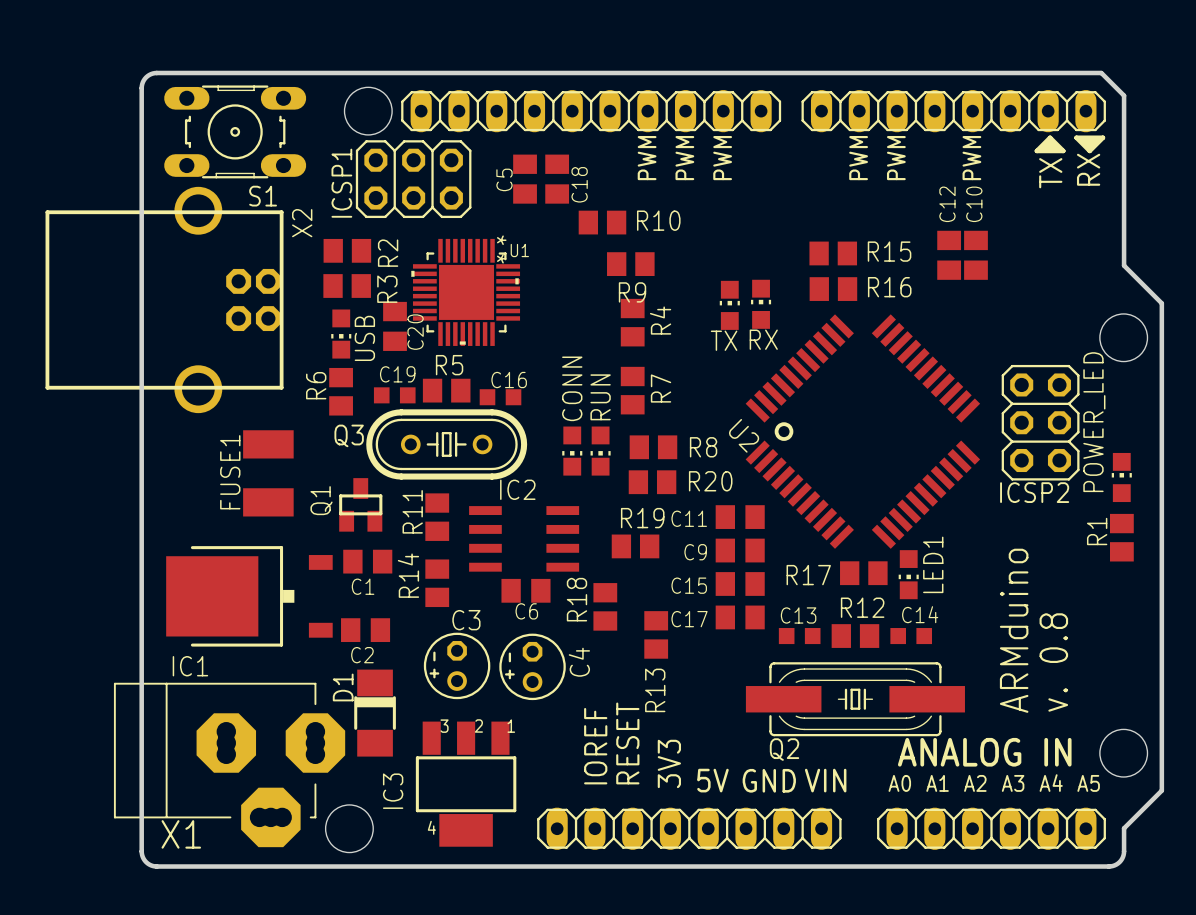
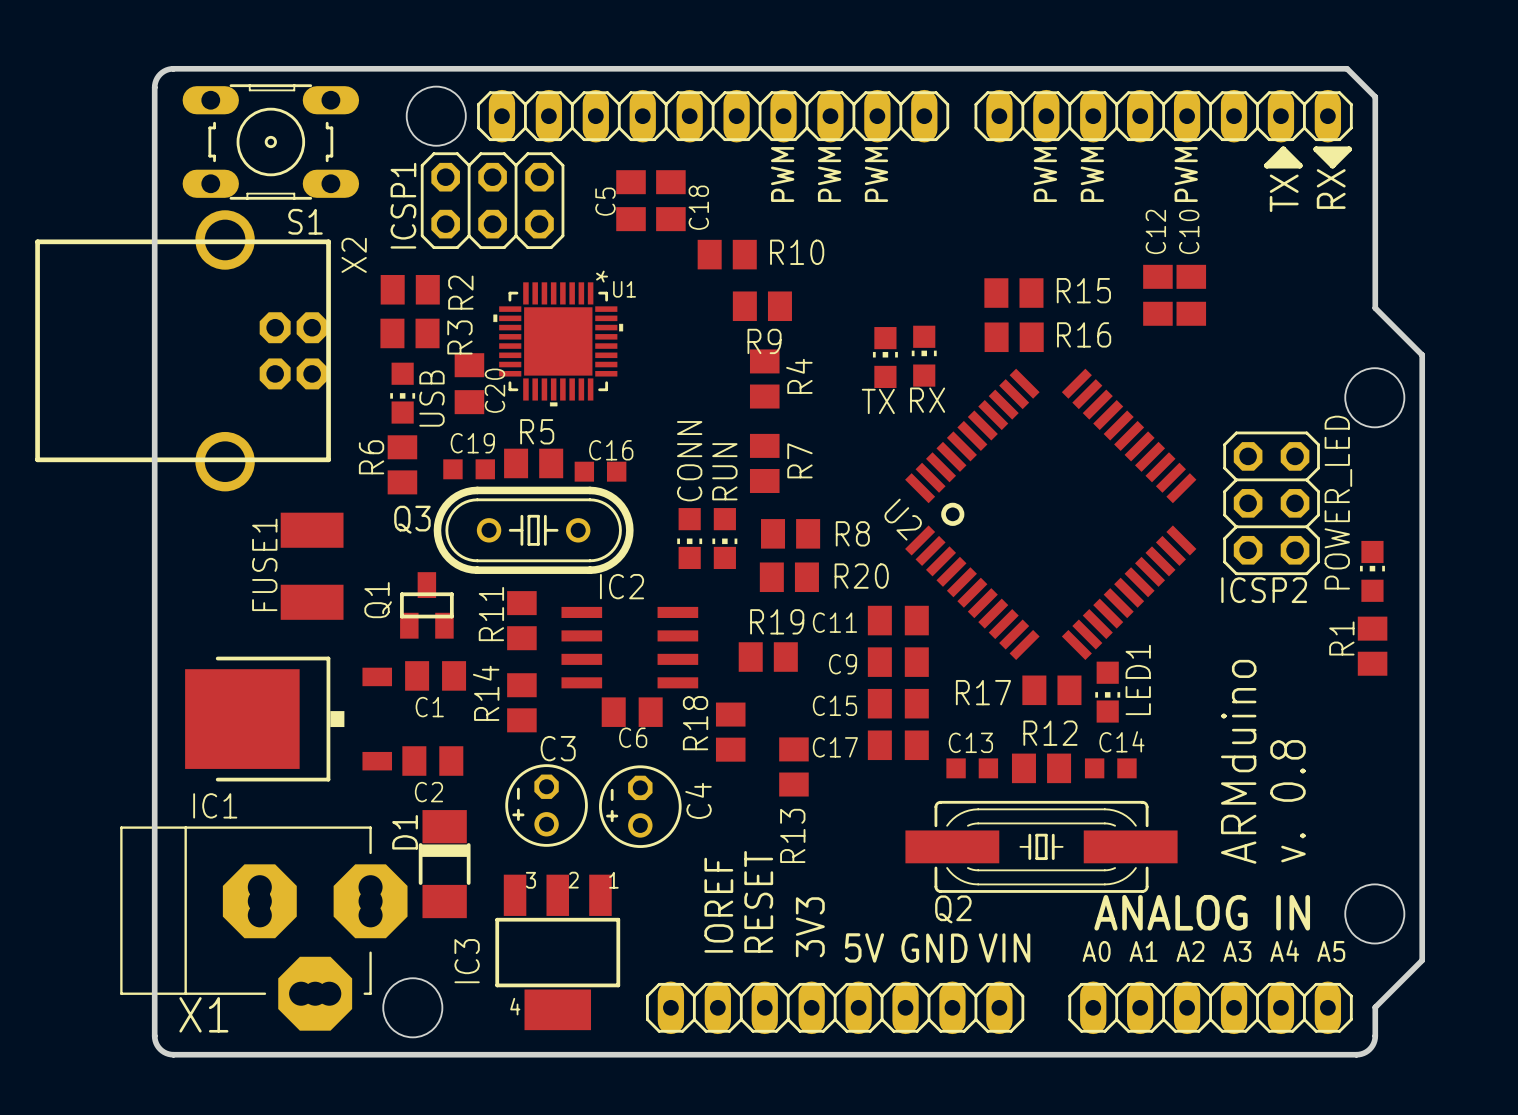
part footprint: [411, 238, 521, 346] -> [493, 282, 624, 407]

